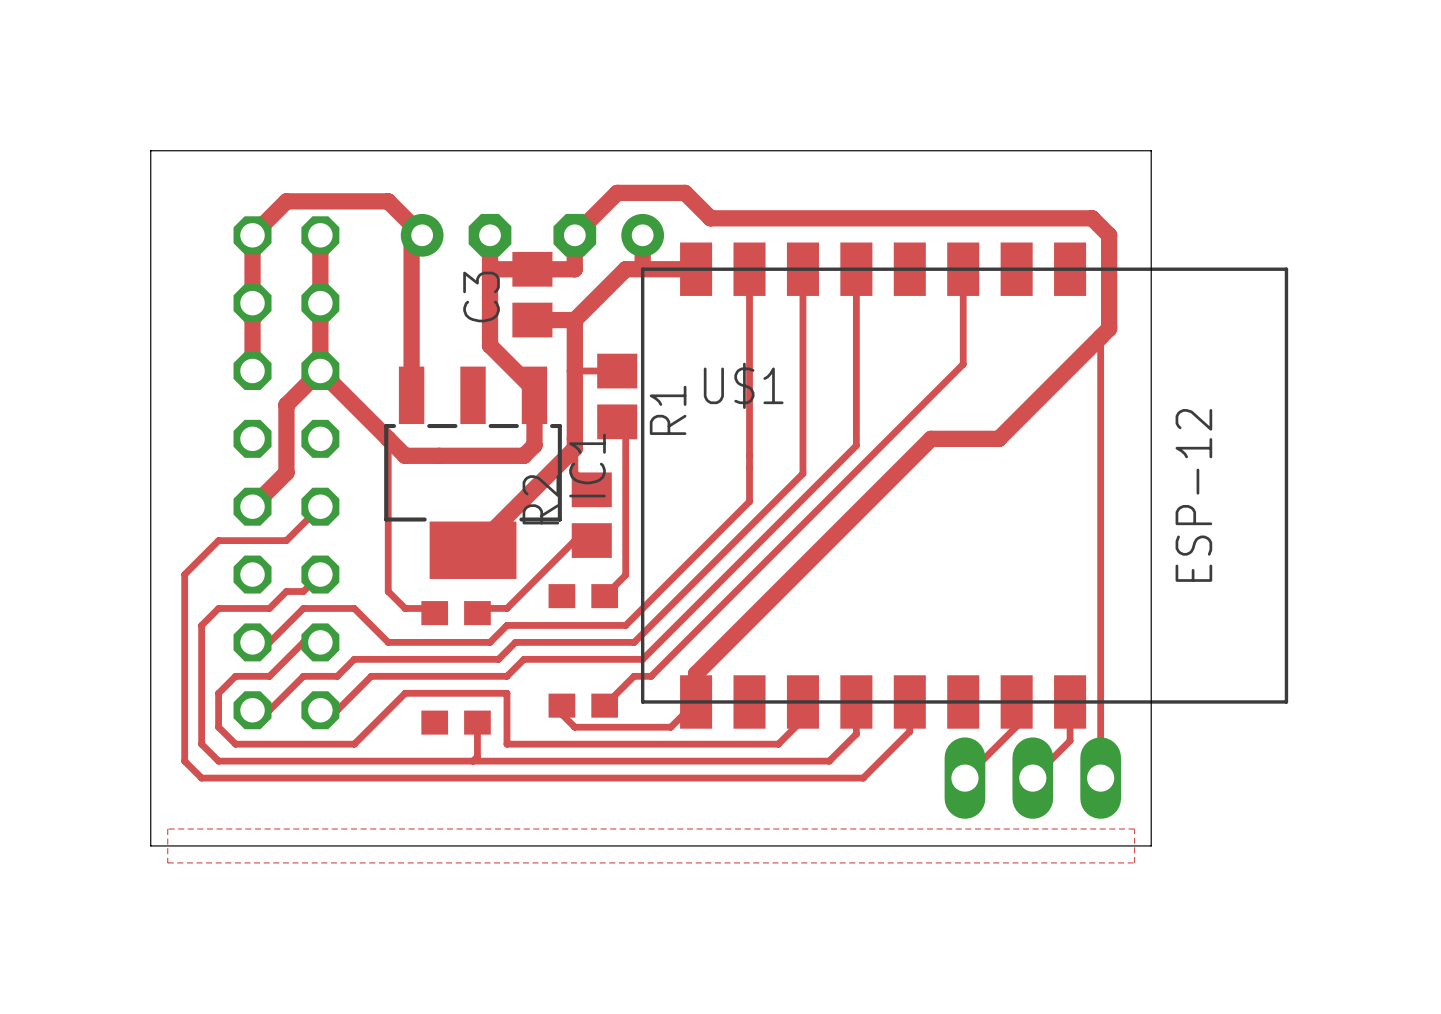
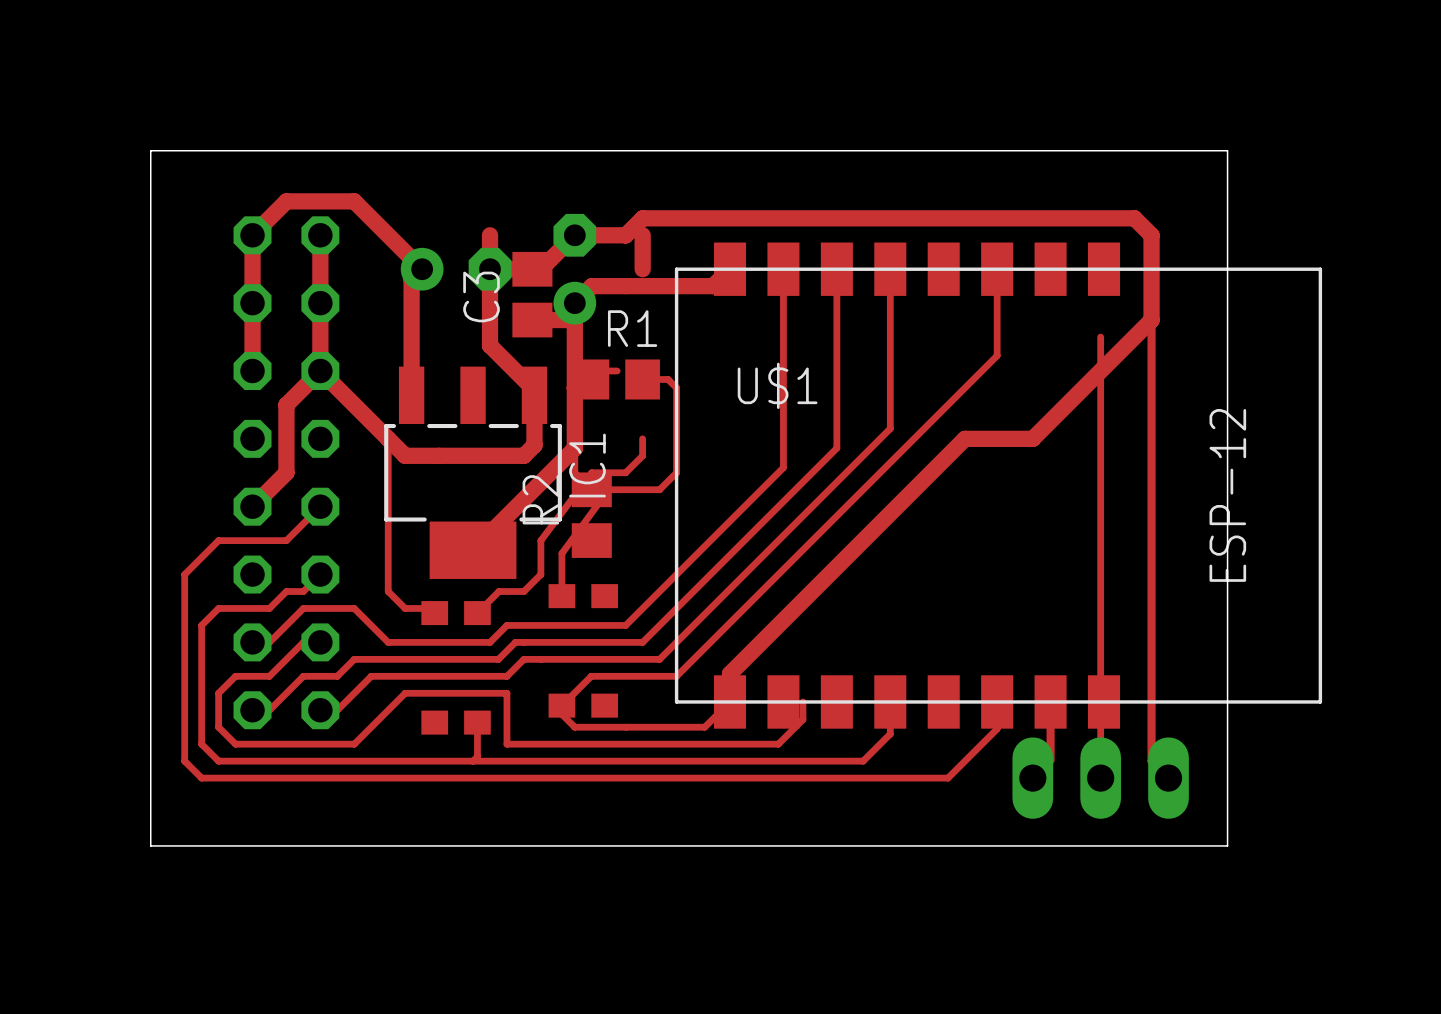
board edge: (1151, 150) (1151, 845) -> (1151, 150) (1227, 150) (1227, 845) (1151, 845)
track: (354, 201) (388, 201) (411, 224) (411, 279) -> (354, 201) (422, 269) (411, 279)
track: (710, 218) (685, 192) (617, 192) (574, 235) (574, 269) (540, 269) -> (710, 218) (642, 218) (625, 235) (574, 235) (540, 269)
track: (1092, 218) (1109, 235) (1109, 328) (998, 438) -> (1151, 320) (1032, 438) (998, 438)
track: none -> (1092, 218) (1134, 218) (1151, 235) (1151, 320)
part position: (456, 235) -> (456, 269)
part rotation: 0° (608, 235) -> 90° clockwise (574, 269)
track: (696, 269) (625, 269) (574, 320) -> (730, 269) (713, 286) (591, 286) (574, 303) (574, 320)
track: (749, 269) (749, 501) -> (783, 269) (783, 467) (749, 501)
track: (802, 269) (802, 473) (634, 642) -> (836, 269) (836, 448) (642, 642) (634, 642)
track: (856, 269) (856, 445) (642, 659) -> (890, 269) (890, 428) (659, 659) (642, 659)
track: (963, 269) (963, 364) (651, 676) -> (997, 269) (997, 355) (676, 676) (651, 676)
track: none -> (1151, 320) (1151, 761) (1168, 778)
track: none -> (642, 379) (668, 379) (676, 387) (676, 472) (659, 489) (608, 489) (561, 553) (561, 596)
R1 rotation: 0° (617, 396) -> 90° clockwise (617, 379)
R1 name position: R1 (668, 410) -> R1 (632, 328)
track: (617, 421) (625, 430) (625, 575) (604, 596) -> none
track: (964, 438) (931, 438) (696, 673) (696, 701) (670, 727) -> (964, 438) (730, 673) (730, 701) (704, 727) (670, 727)
U$1 position: (964, 485) -> (998, 485)
track: (591, 540) (574, 540) (540, 574) -> (642, 438) (642, 455) (625, 472) (591, 472) (540, 540) (540, 574)
track: (523, 591) (507, 608) (482, 608) -> (523, 591) (499, 591) (482, 608)
track: (633, 676) (604, 705) -> (633, 676) (591, 676) (561, 705)
track: (856, 701) (856, 734) (829, 761) -> (890, 701) (890, 734) (863, 761) (829, 761)
track: (909, 701) (909, 731) (863, 778) -> (997, 701) (997, 728) (948, 778) (863, 778)
track: (1016, 701) (1016, 726) (964, 778) -> none
track: (1070, 701) (1070, 740) (1050, 760) -> (1050, 701) (1050, 760)
part position: (1032, 778) -> (1100, 778)
zone outline: (167, 828) (167, 862) (1134, 862) (1134, 828) (167, 828) -> none

